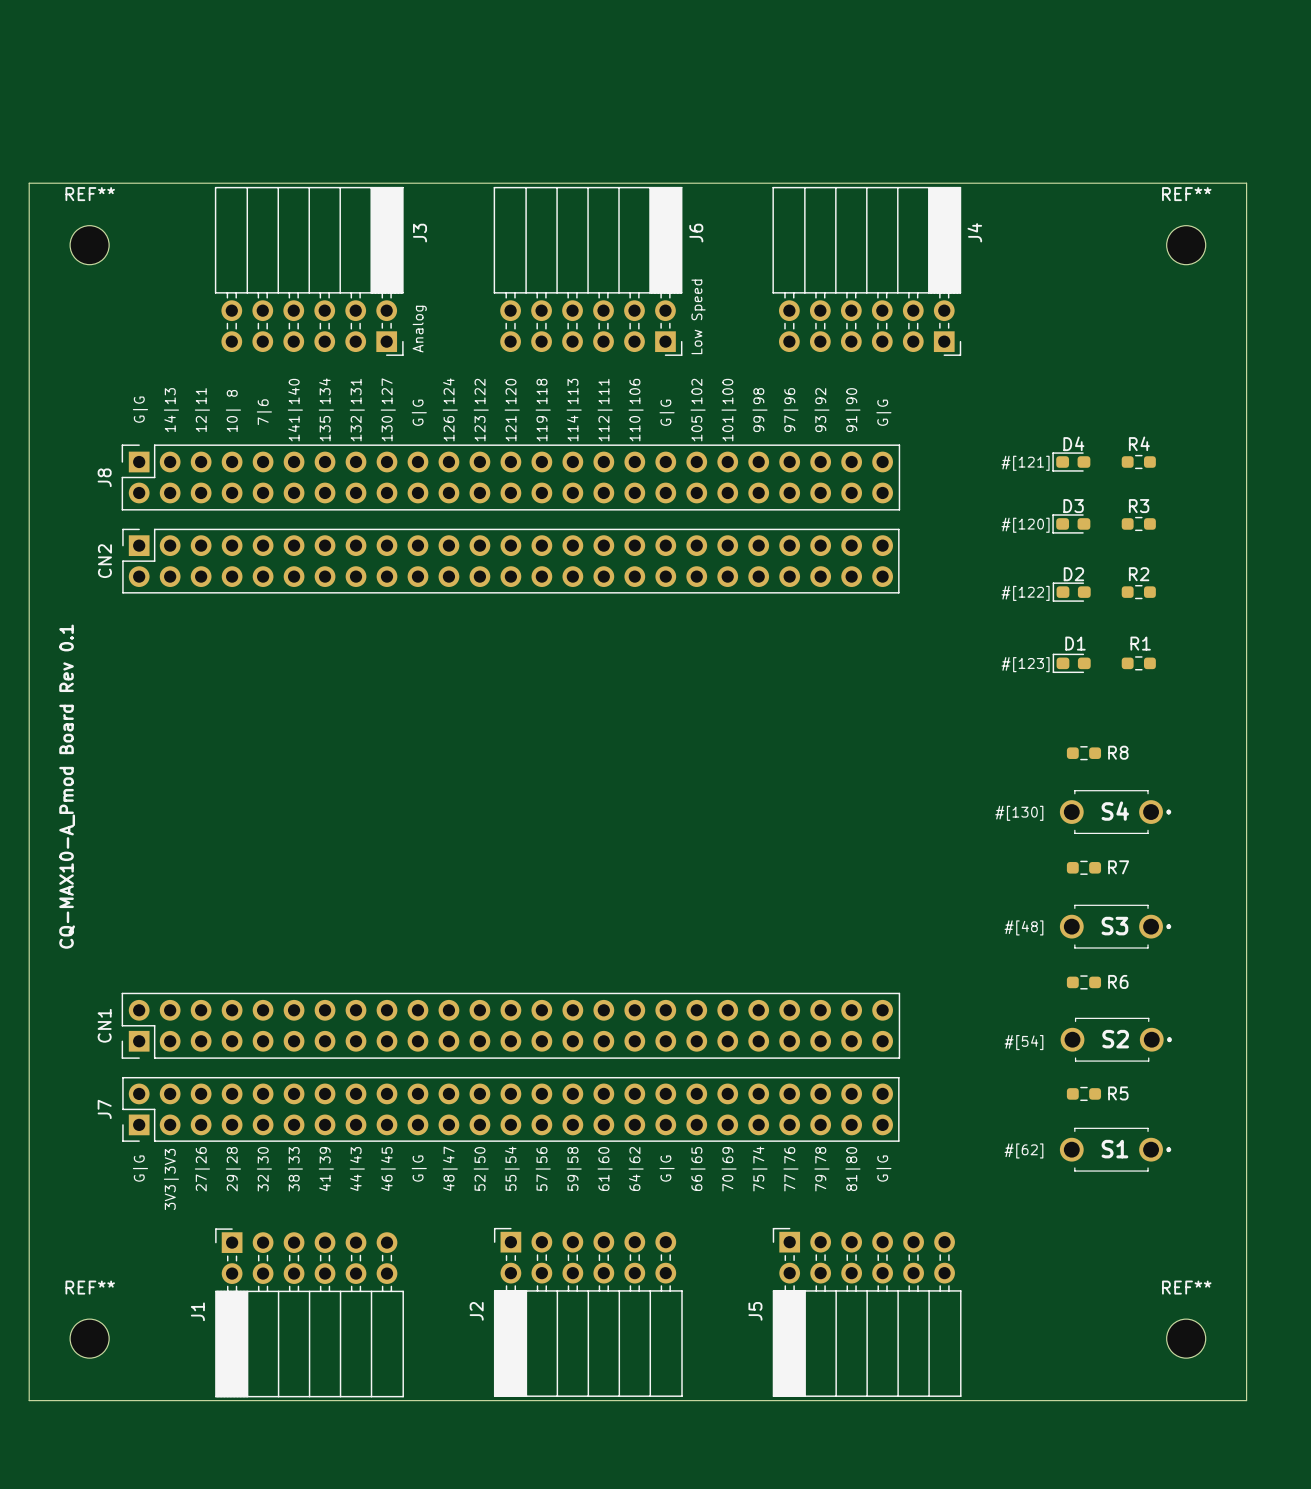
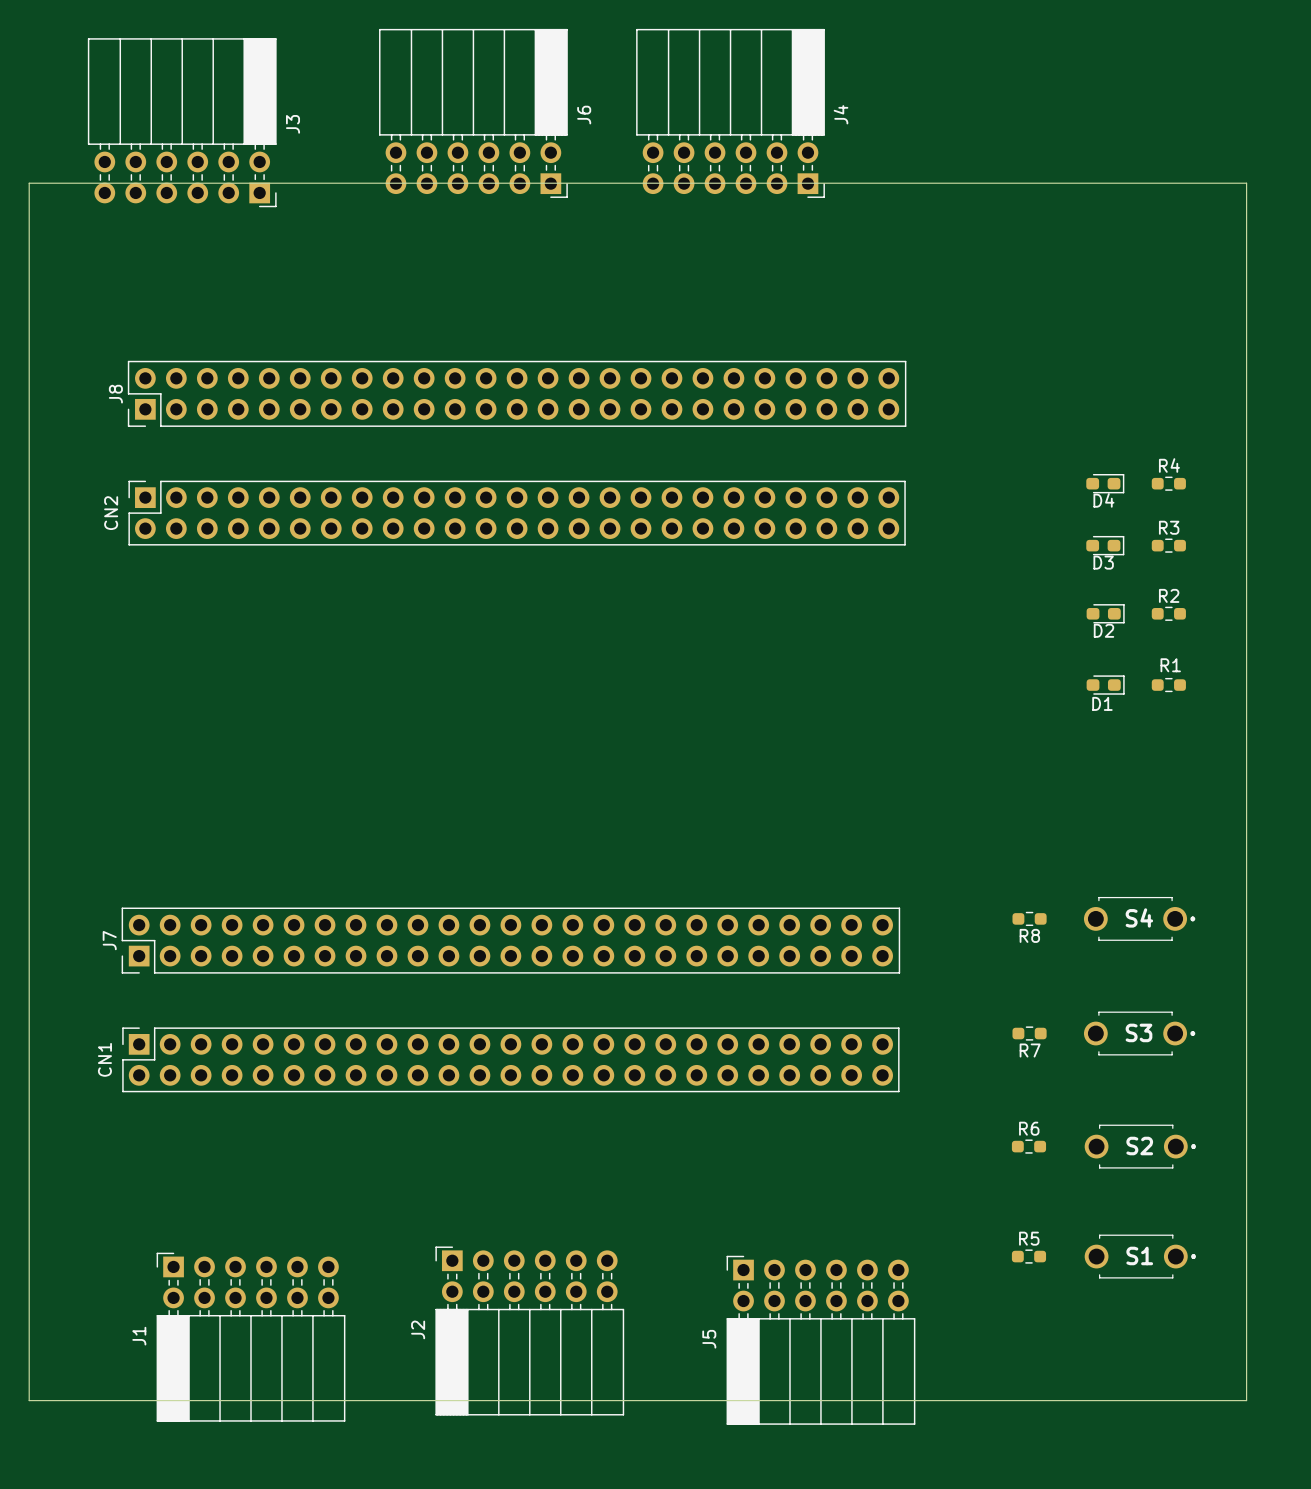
J4 name position: J4 (974, 232) -> J4 (841, 114)
J3 name position: J3 (420, 233) -> J3 (293, 124)
J6 name position: J6 (696, 233) -> J6 (584, 115)
REF**: (89, 245) -> none
REF**: (1186, 245) -> none
J3 position: (309, 271) -> (182, 122)
J6 position: (588, 271) -> (473, 113)
J4 position: (866, 271) -> (730, 113)
text: Low Speed (698, 316) -> none
text: Analog (419, 329) -> none
text: G|G (140, 409) -> none
text: 135|134 (326, 409) -> none
text: 130|127 (388, 409) -> none
text: 126|124 (450, 409) -> none
text: 14|13 (171, 410) -> none
text: 12|11 (202, 410) -> none
text: 141|140 (295, 410) -> none
text: 132|131 (357, 410) -> none
text: 123|122 (481, 410) -> none
text: 121|120 (512, 410) -> none
text: 119|118 (543, 410) -> none
text: 114|113 (574, 410) -> none
text: 112|111 (605, 410) -> none
text: 110|106 (636, 410) -> none
text: 105|102 (698, 410) -> none
text: 101|100 (729, 410) -> none
text: 99|98 (759, 410) -> none
text: 97|96 (790, 410) -> none
text: 93|92 (821, 410) -> none
text: 91|90 (852, 410) -> none
text: 10| 8 (233, 411) -> none
text: 7|6 (264, 412) -> none
text: G|G (419, 412) -> none
text: G|G (667, 412) -> none
text: G|G (883, 412) -> none
J8 footprint: [121, 444, 901, 511] -> [127, 360, 907, 427]
D4 rotation: 0° (1071, 462) -> 180° (1105, 483)
D4 position: (1071, 462) -> (1105, 483)
R4 position: (1138, 462) -> (1168, 483)
text: #[121] (1025, 463) -> none
D3 rotation: 0° (1071, 523) -> 180° (1105, 545)
D3 position: (1071, 523) -> (1105, 545)
R3 position: (1138, 523) -> (1168, 545)
text: #[120] (1025, 525) -> none
CN2 position: (510, 561) -> (517, 513)
D2 rotation: 0° (1071, 592) -> 180° (1105, 613)
D2 position: (1071, 592) -> (1105, 613)
R2 position: (1138, 592) -> (1168, 613)
text: #[122] (1025, 593) -> none
D1 rotation: 0° (1071, 663) -> 180° (1105, 685)
D1 position: (1071, 663) -> (1105, 685)
R1 position: (1138, 663) -> (1168, 685)
text: #[123] (1025, 664) -> none
R8 name position: R8 (1118, 752) -> R8 (1029, 935)
R8 position: (1083, 753) -> (1029, 918)
text: CQ-MAX10-A_Pmod Board Rev 0.1 (67, 786) -> none
S4 position: (1115, 812) -> (1139, 918)
text: #[130] (1019, 813) -> none
R7 position: (1083, 867) -> (1029, 1033)
R7 name position: R7 (1118, 867) -> R7 (1030, 1050)
S3 position: (1115, 926) -> (1139, 1033)
text: #[48] (1023, 927) -> none
R6 name position: R6 (1118, 981) -> R6 (1029, 1128)
R6 position: (1083, 982) -> (1028, 1146)
CN1 name position: CN1 (104, 1025) -> CN1 (104, 1059)
J7 position: (510, 1025) -> (510, 940)
S2 position: (1116, 1039) -> (1140, 1146)
text: #[54] (1023, 1042) -> none
CN1 footprint: [122, 1076, 900, 1142] -> [122, 1027, 900, 1093]
R5 position: (1083, 1093) -> (1028, 1256)
R5 name position: R5 (1118, 1093) -> R5 (1029, 1238)
J7 name position: J7 (104, 1109) -> J7 (109, 940)
S1 position: (1115, 1149) -> (1140, 1256)
text: #[62] (1023, 1150) -> none
text: G|G (140, 1168) -> none
text: G|G (419, 1168) -> none
text: 48|47 (450, 1168) -> none
text: 55|54 (512, 1168) -> none
text: G|G (667, 1168) -> none
text: G|G (883, 1168) -> none
text: 27|26 (202, 1169) -> none
text: 29|28 (233, 1169) -> none
text: 32|30 (264, 1169) -> none
text: 38|33 (295, 1169) -> none
text: 41|39 (326, 1169) -> none
text: 44|43 (357, 1169) -> none
text: 46|45 (388, 1169) -> none
text: 52|50 (481, 1169) -> none
text: 57|56 (543, 1169) -> none
text: 59|58 (574, 1169) -> none
text: 61|60 (605, 1169) -> none
text: 64|62 (636, 1169) -> none
text: 66|65 (698, 1169) -> none
text: 70|69 (729, 1169) -> none
text: 75|74 (759, 1169) -> none
text: 77|76 (790, 1169) -> none
text: 79|78 (821, 1169) -> none
text: 81|80 (852, 1169) -> none
text: 3V3|3V3 (171, 1179) -> none
J1 position: (309, 1312) -> (251, 1337)
J2 position: (588, 1312) -> (529, 1330)
J5 position: (867, 1312) -> (820, 1340)
REF**: (89, 1338) -> none
REF**: (1186, 1338) -> none

